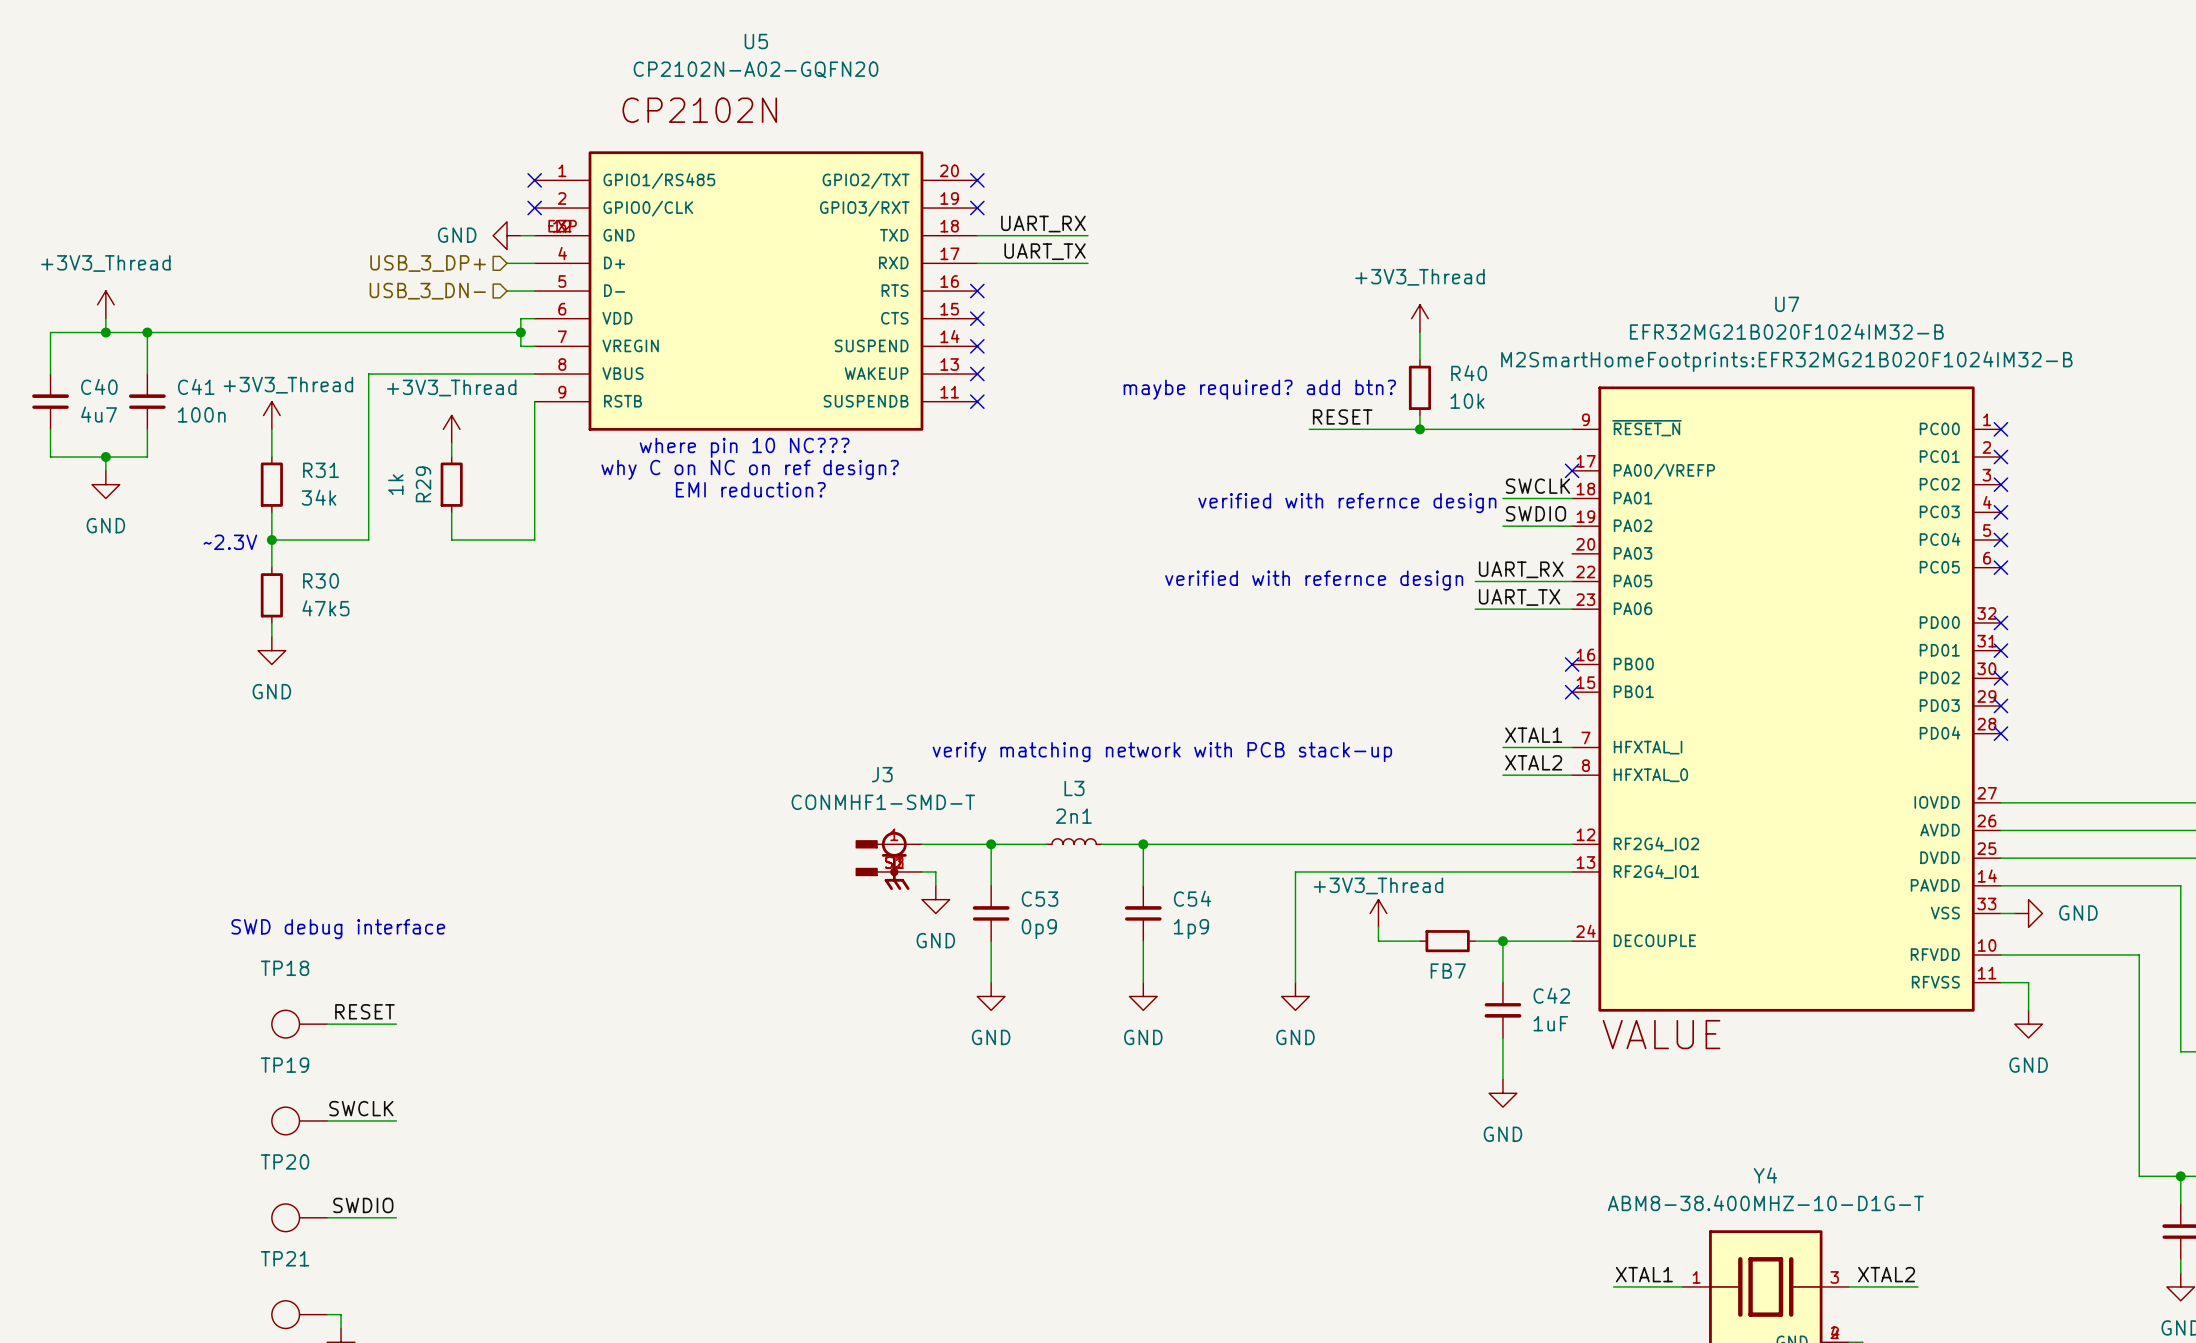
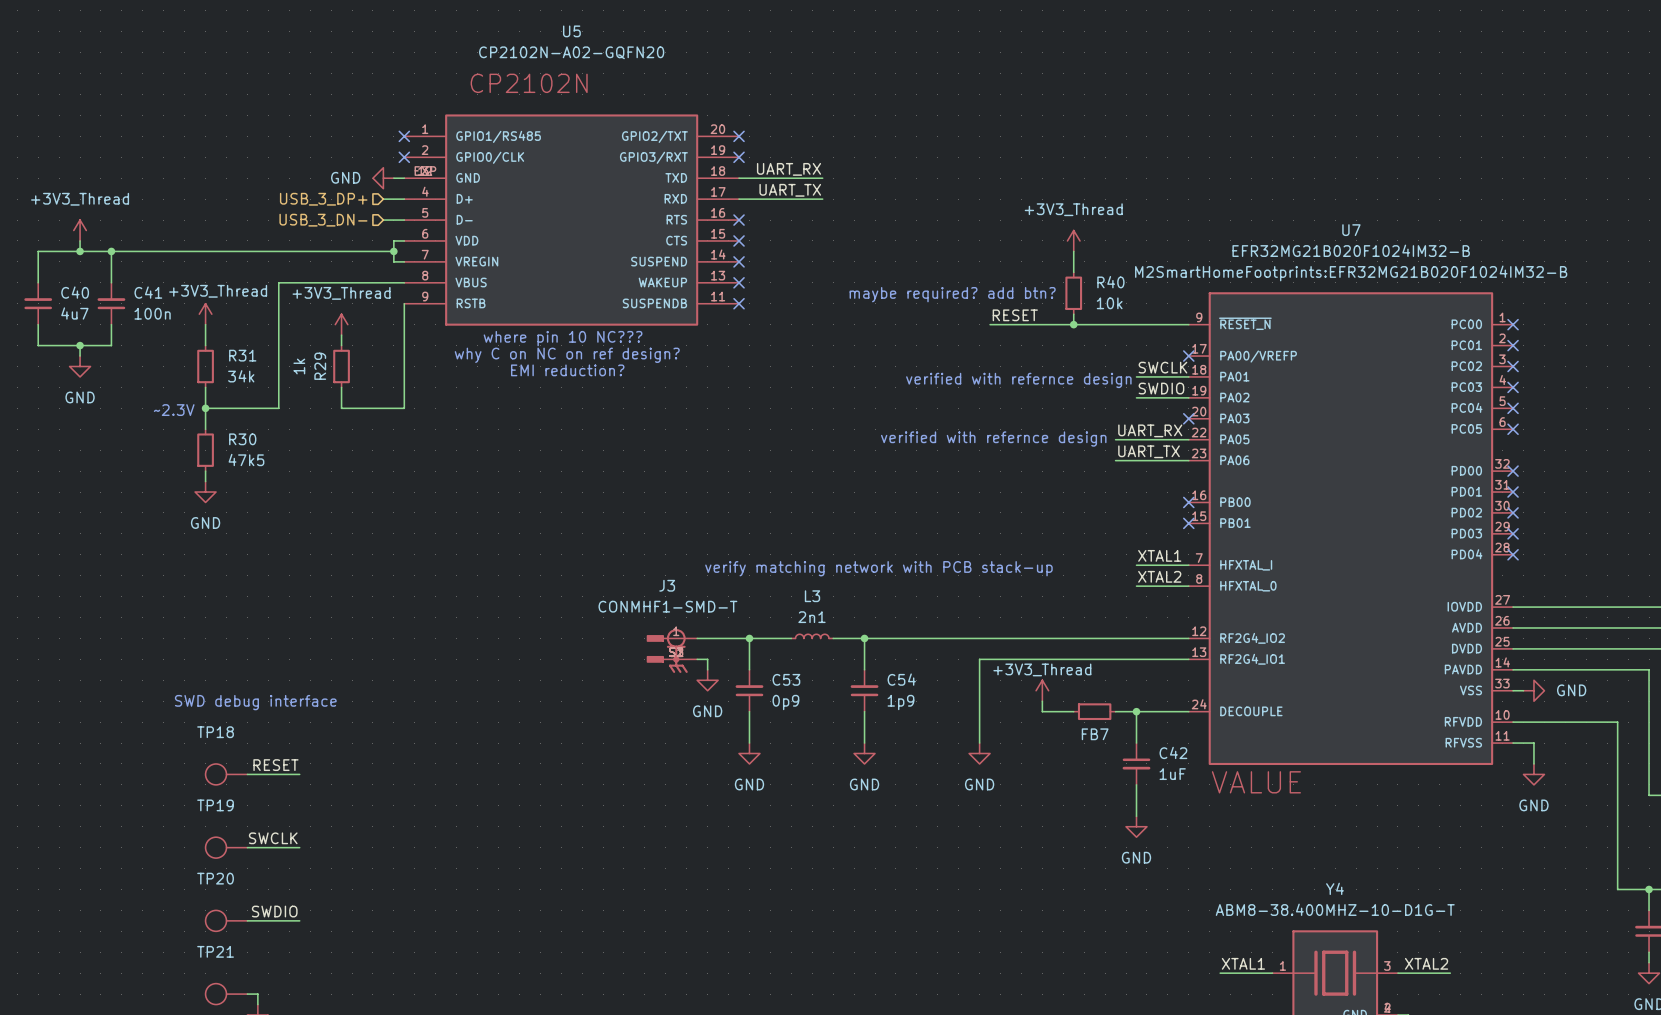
no-connect mark: none -> (1188, 418)

